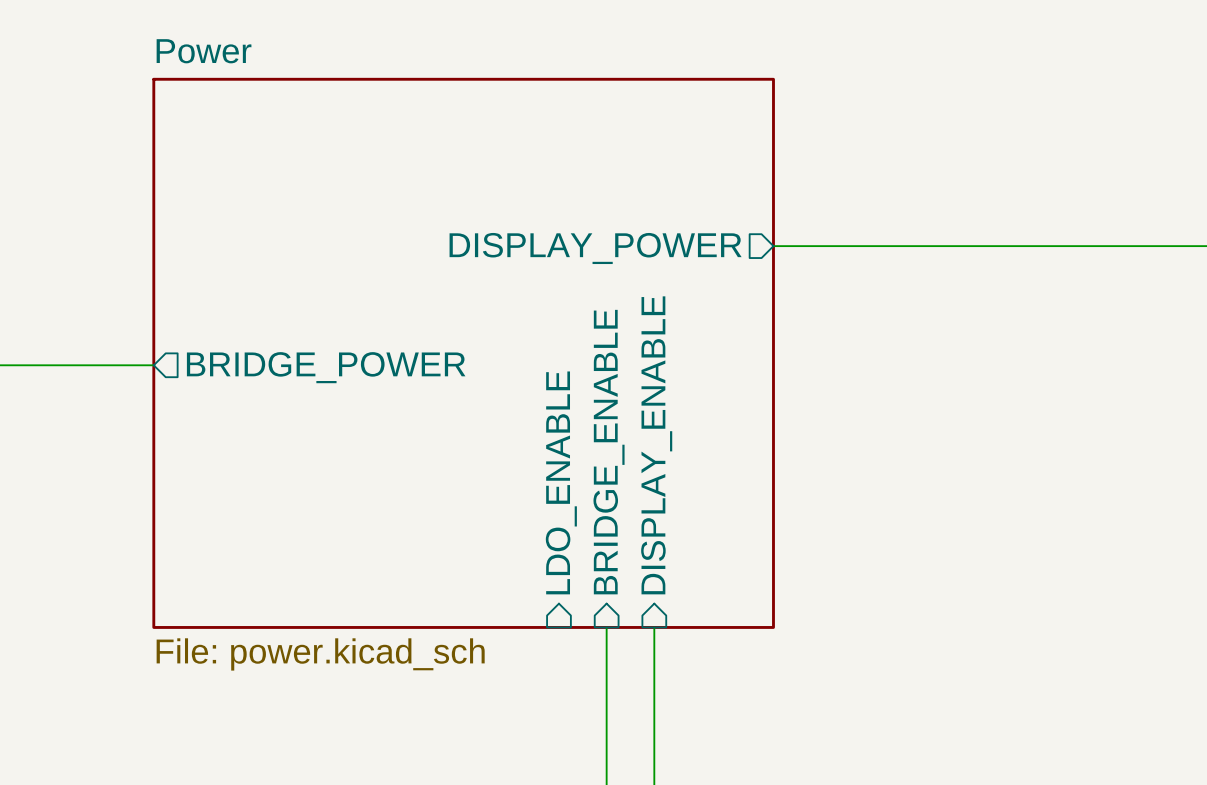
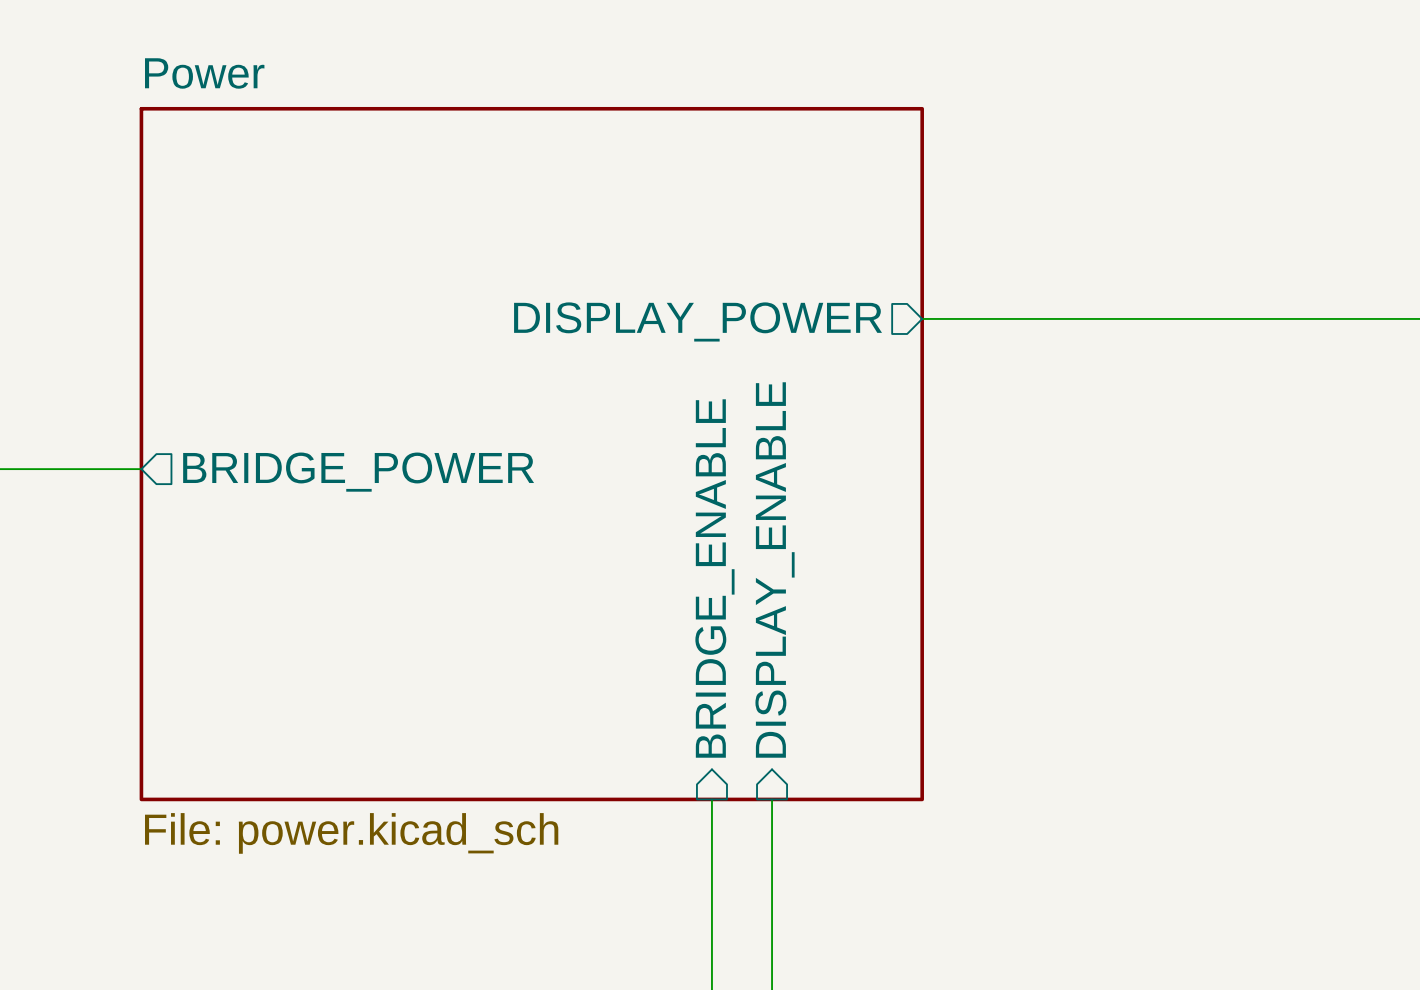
sheet pin: LDO_ENABLE (561, 482) -> none

